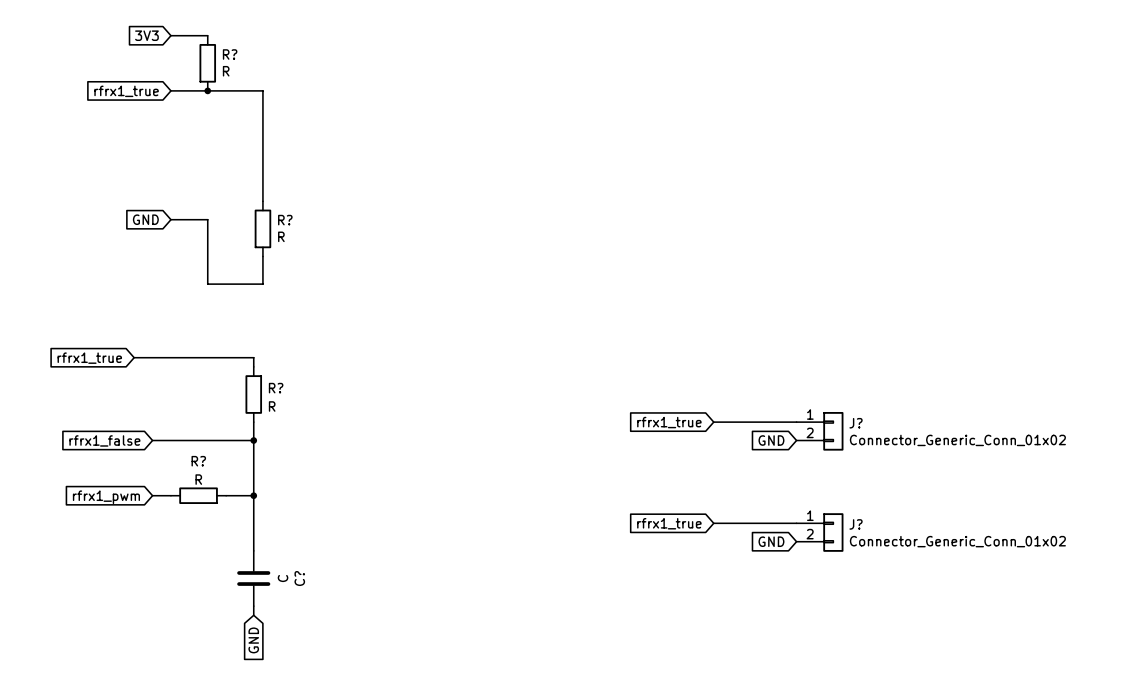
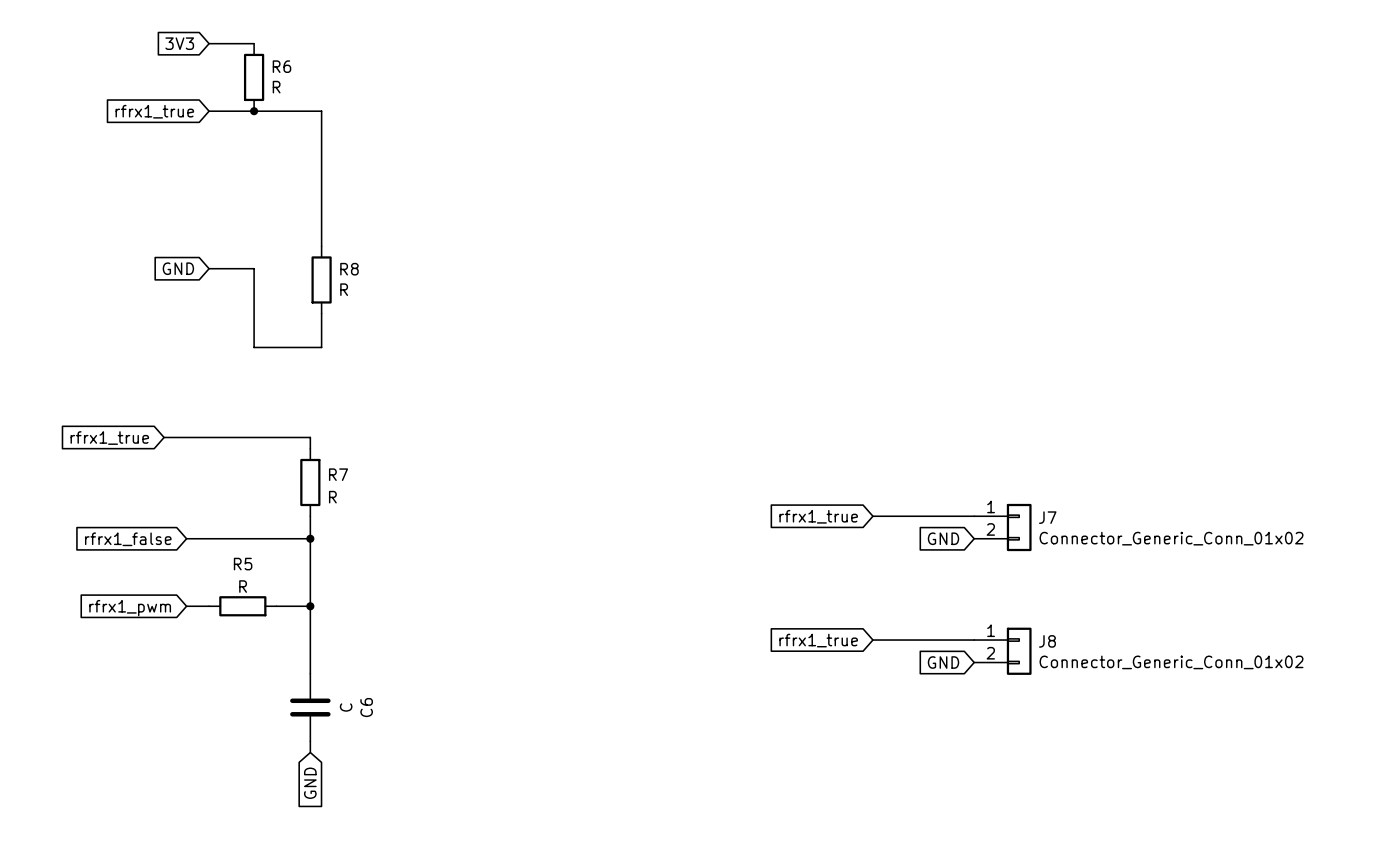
R? name: R? (230, 54) -> R6 (281, 66)
R? name: R? (285, 220) -> R8 (349, 269)
R? name: R? (276, 388) -> R7 (338, 474)
J? name: J? (856, 423) -> J7 (1047, 517)
R? name: R? (198, 461) -> R5 (243, 564)
J? name: J? (856, 524) -> J8 (1047, 641)
C? name: C? (299, 578) -> C6 (366, 707)

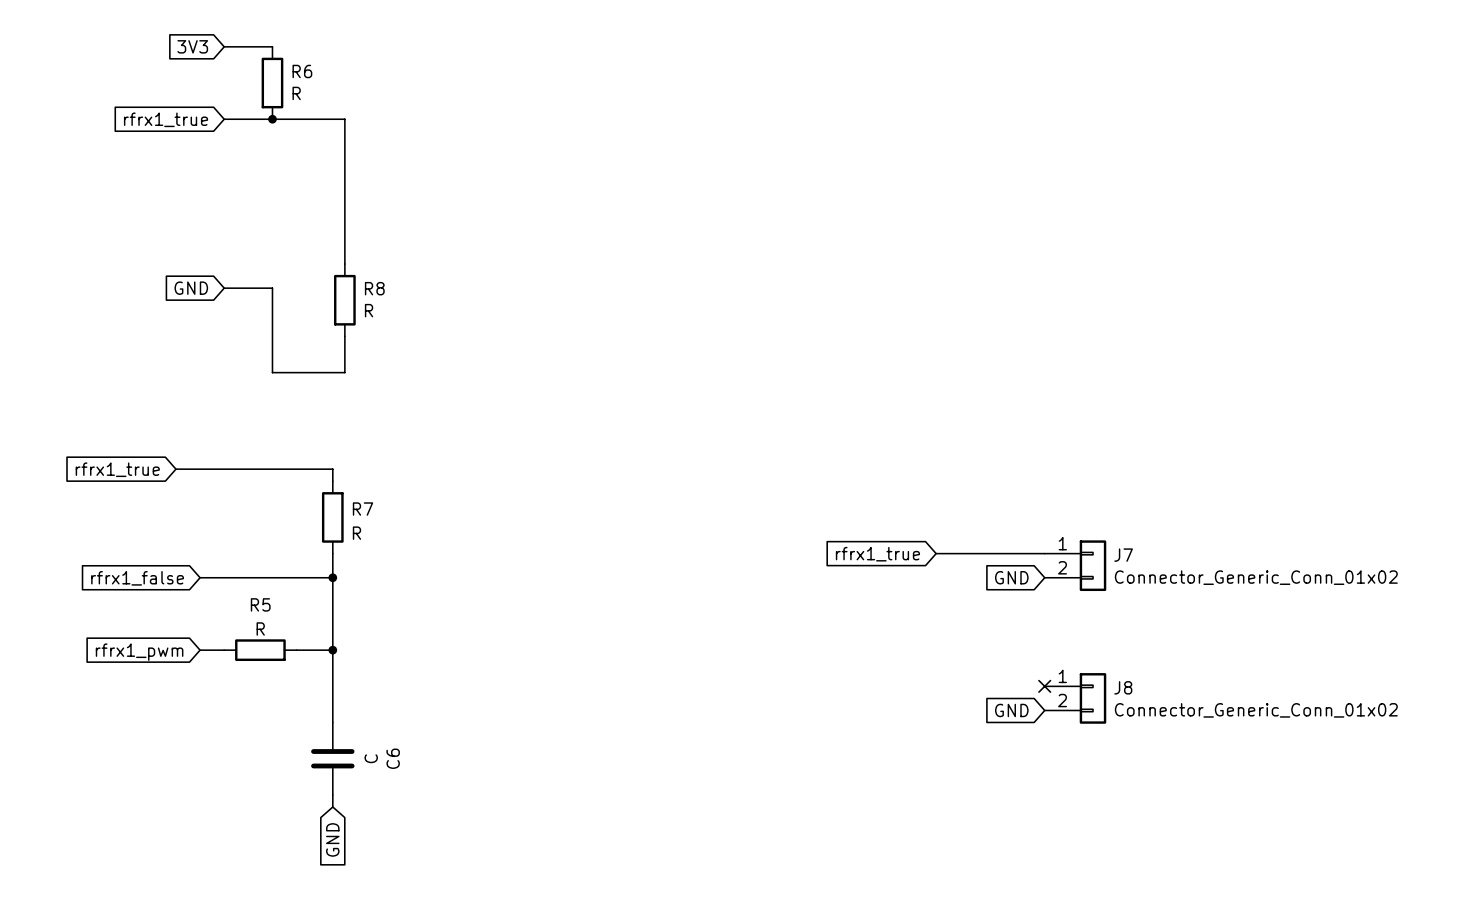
global label: rfrx1_true (818, 640) -> none
wire: (872, 640) (974, 640) -> none
no-connect mark: none -> (1044, 686)

